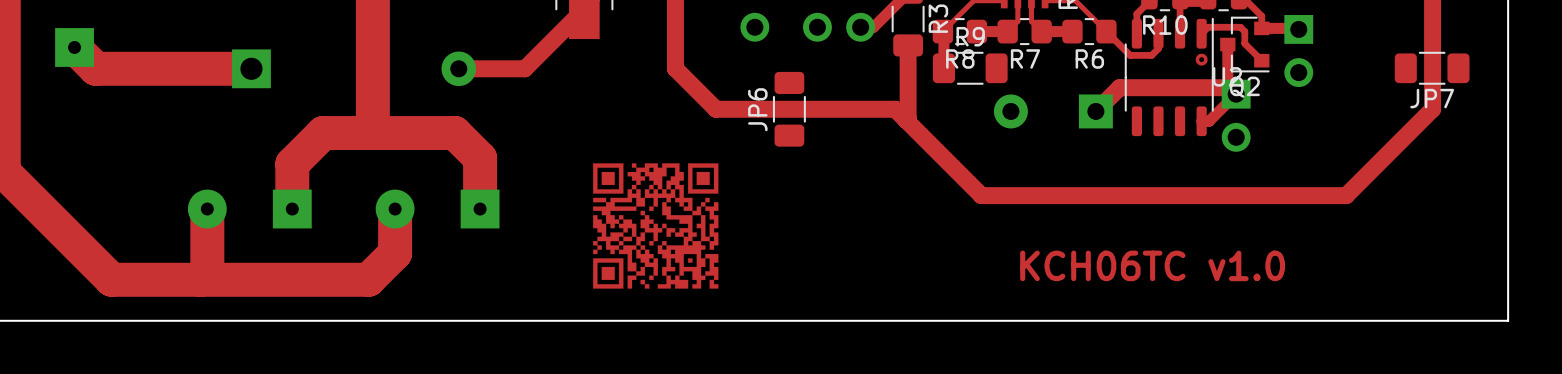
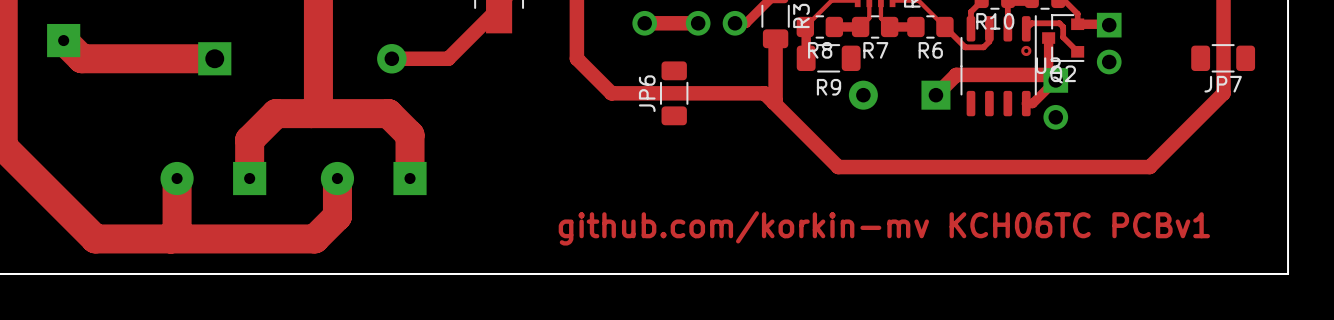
track: none -> (644, 23) (698, 23)
R9 name position: R9 (970, 36) -> R9 (829, 87)
drawing: [593, 163, 719, 289] -> none
text: KCH06TC v1.0 (1152, 265) -> none
text: none -> github.com/korkin-mv KCH06TC PCBv1 (884, 228)

